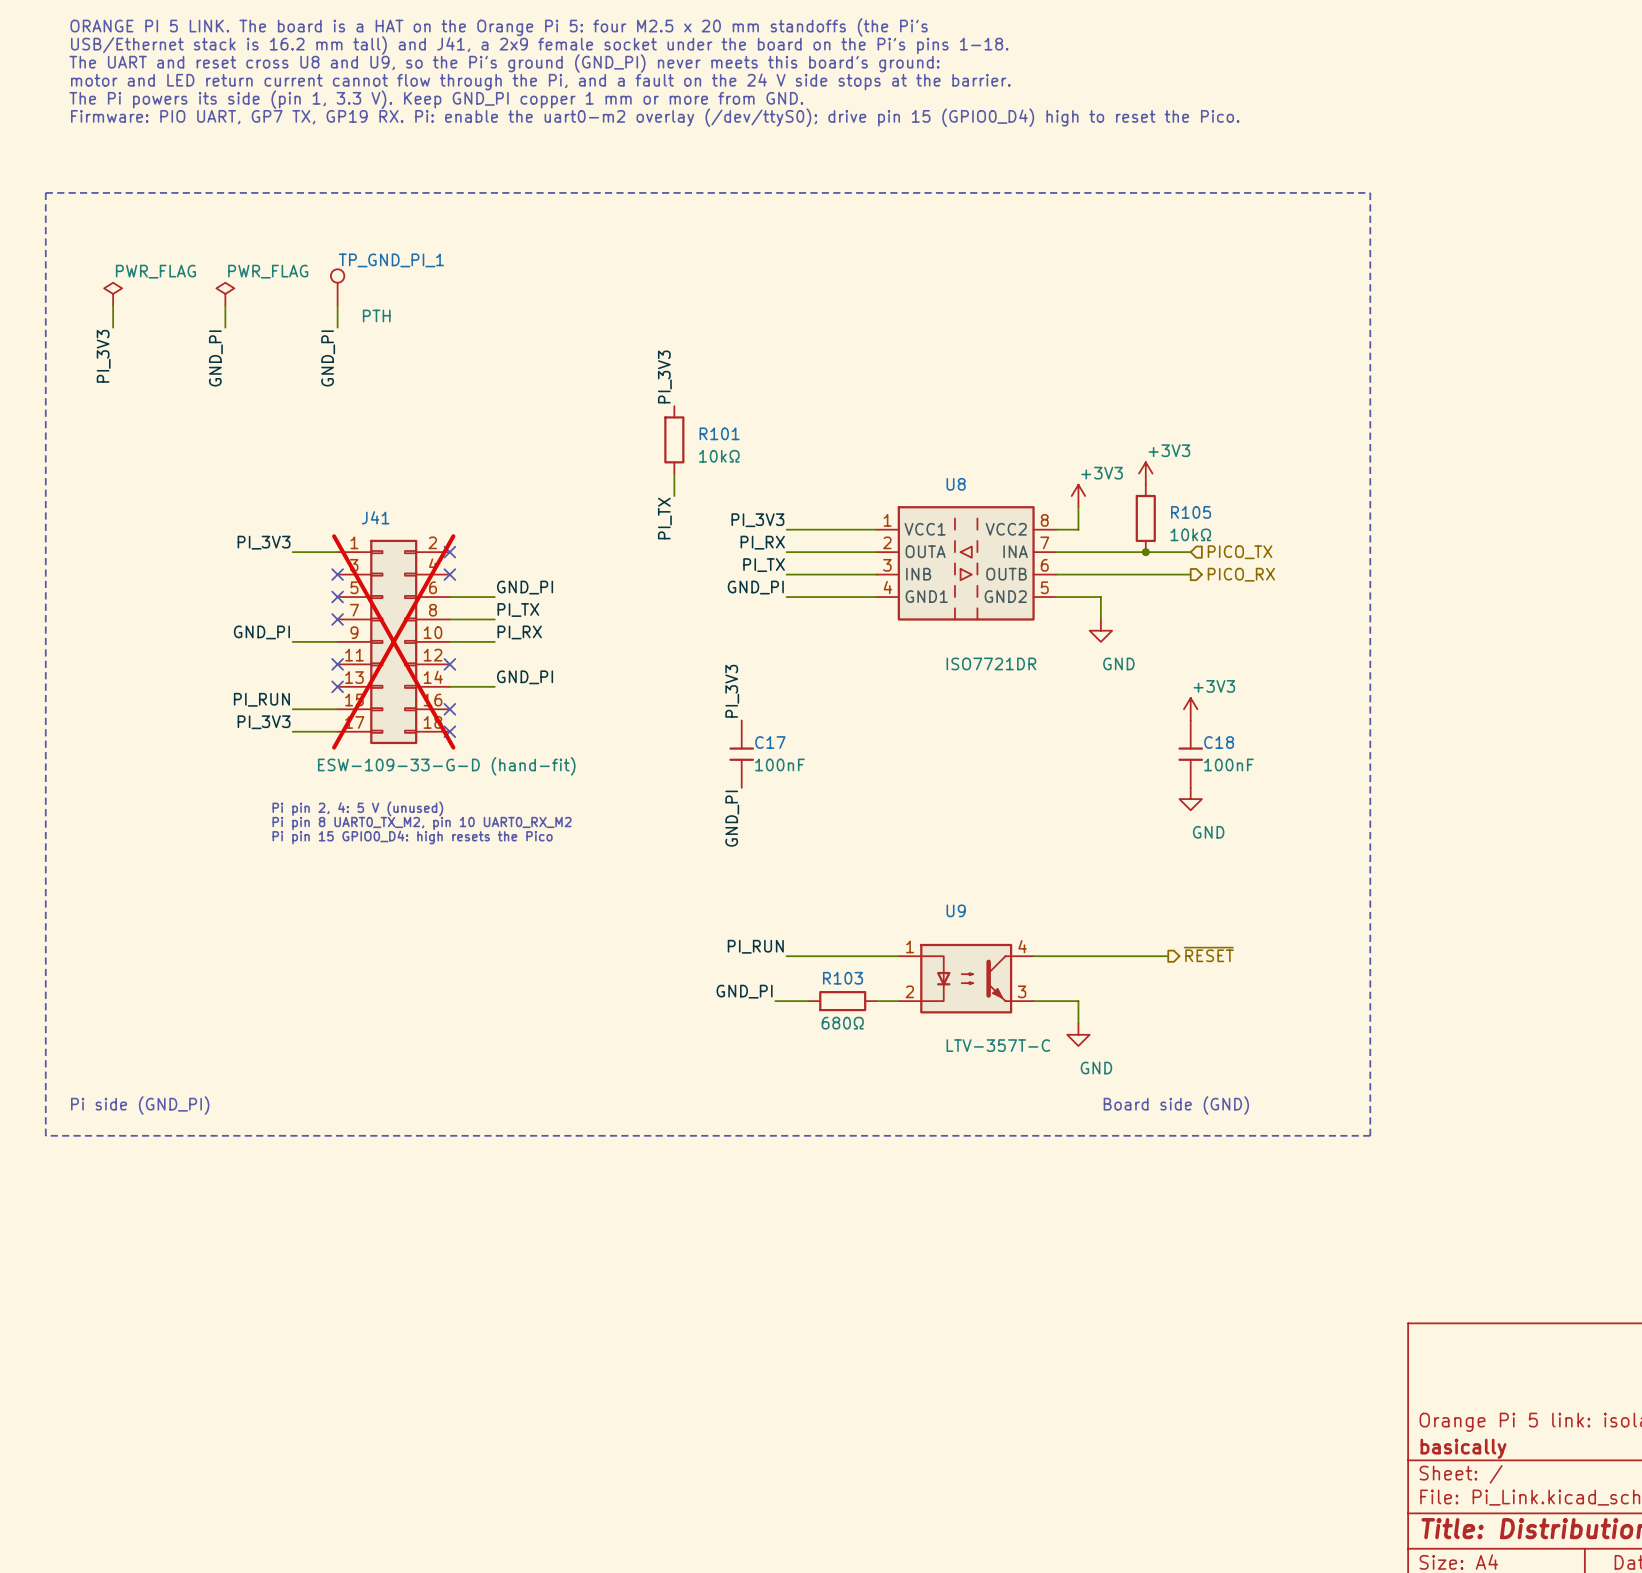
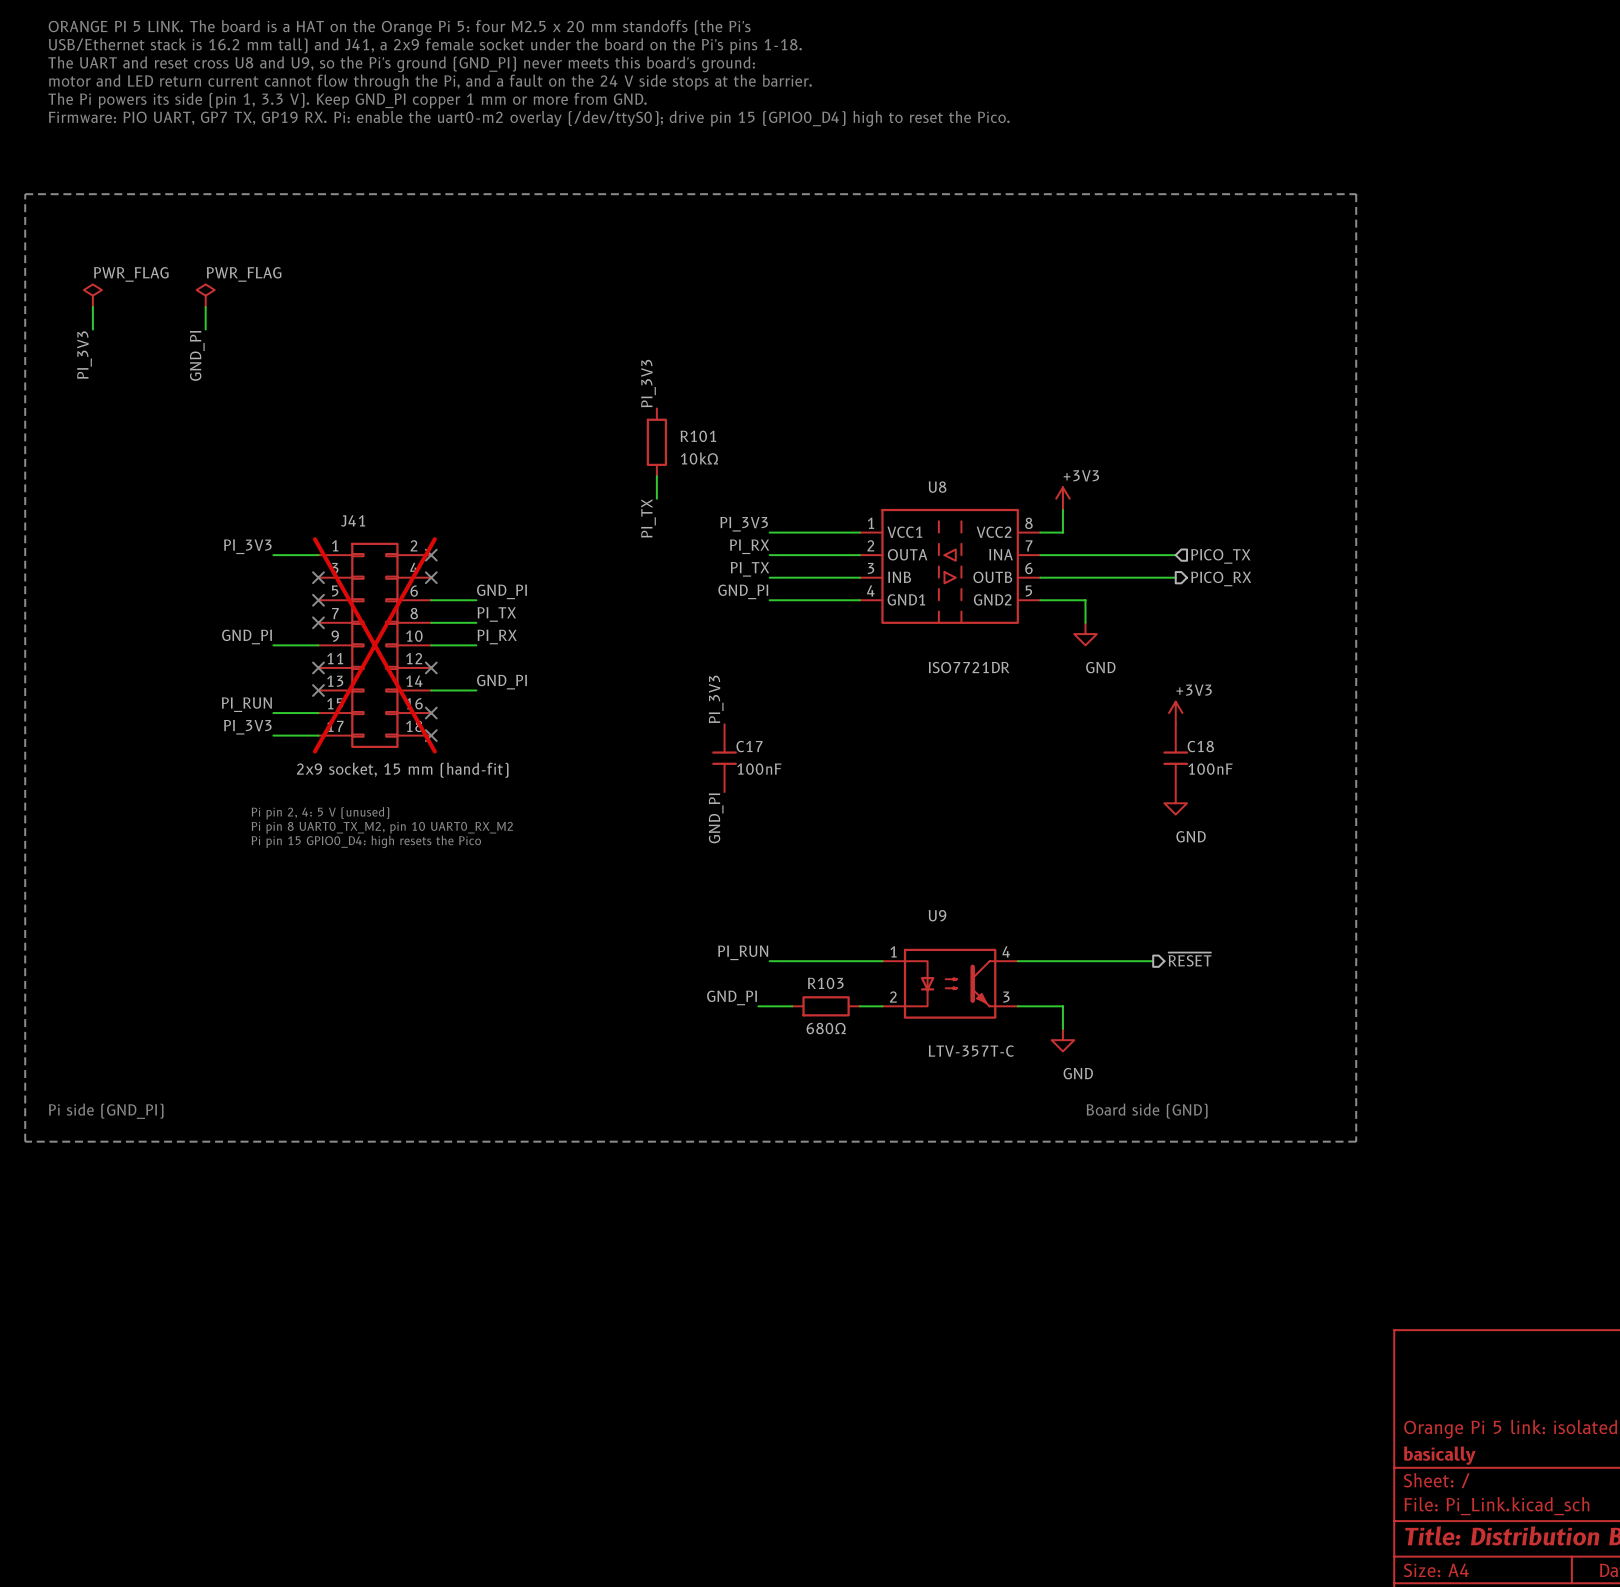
TP_GND_PI_1: PTH (337, 287) -> none
wire: (337, 305) (337, 327) -> none
label: GND_PI (328, 358) -> none
power symbol: +3V3 (1145, 473) -> none
R105: 10kΩ (1145, 518) -> none
junction: (1145, 552) -> none
J41 value: ESW-109-33-G-D (hand-fit) (446, 766) -> 2x9 socket, 15 mm (hand-fit) (402, 770)

